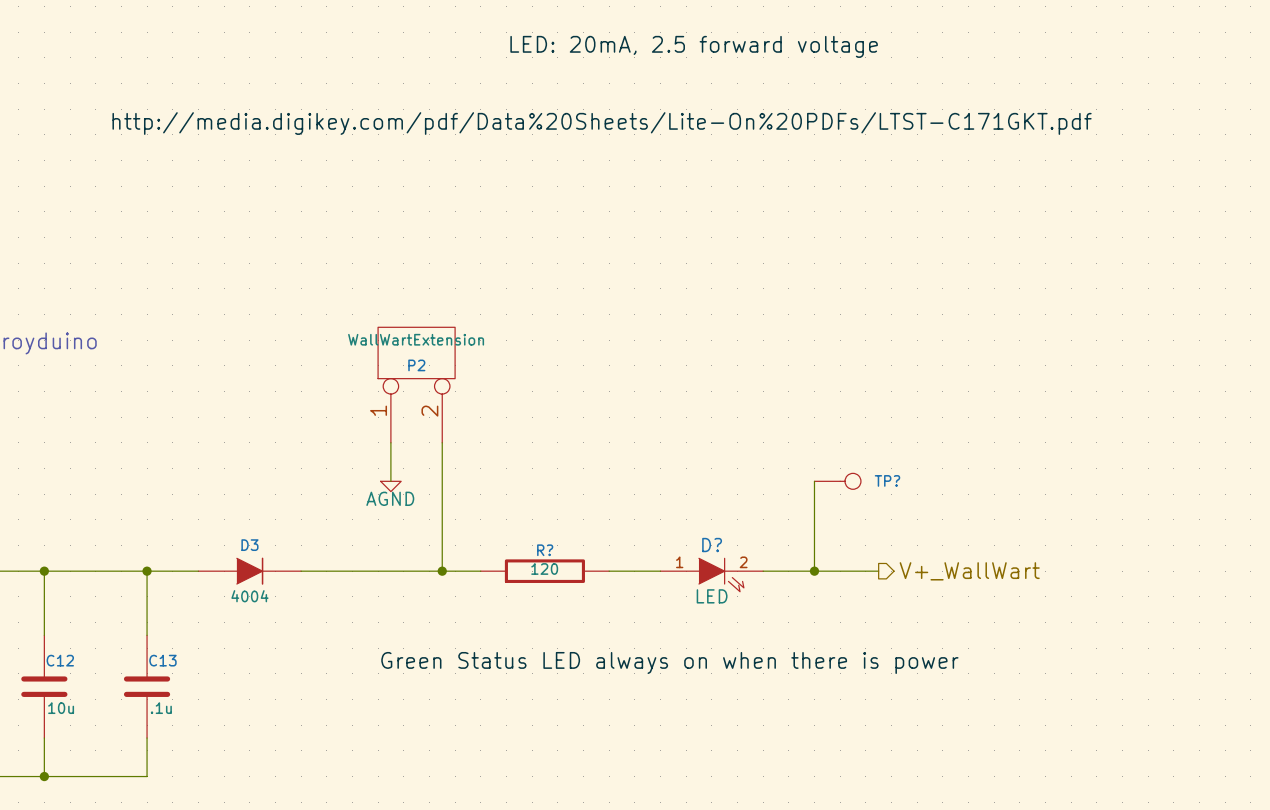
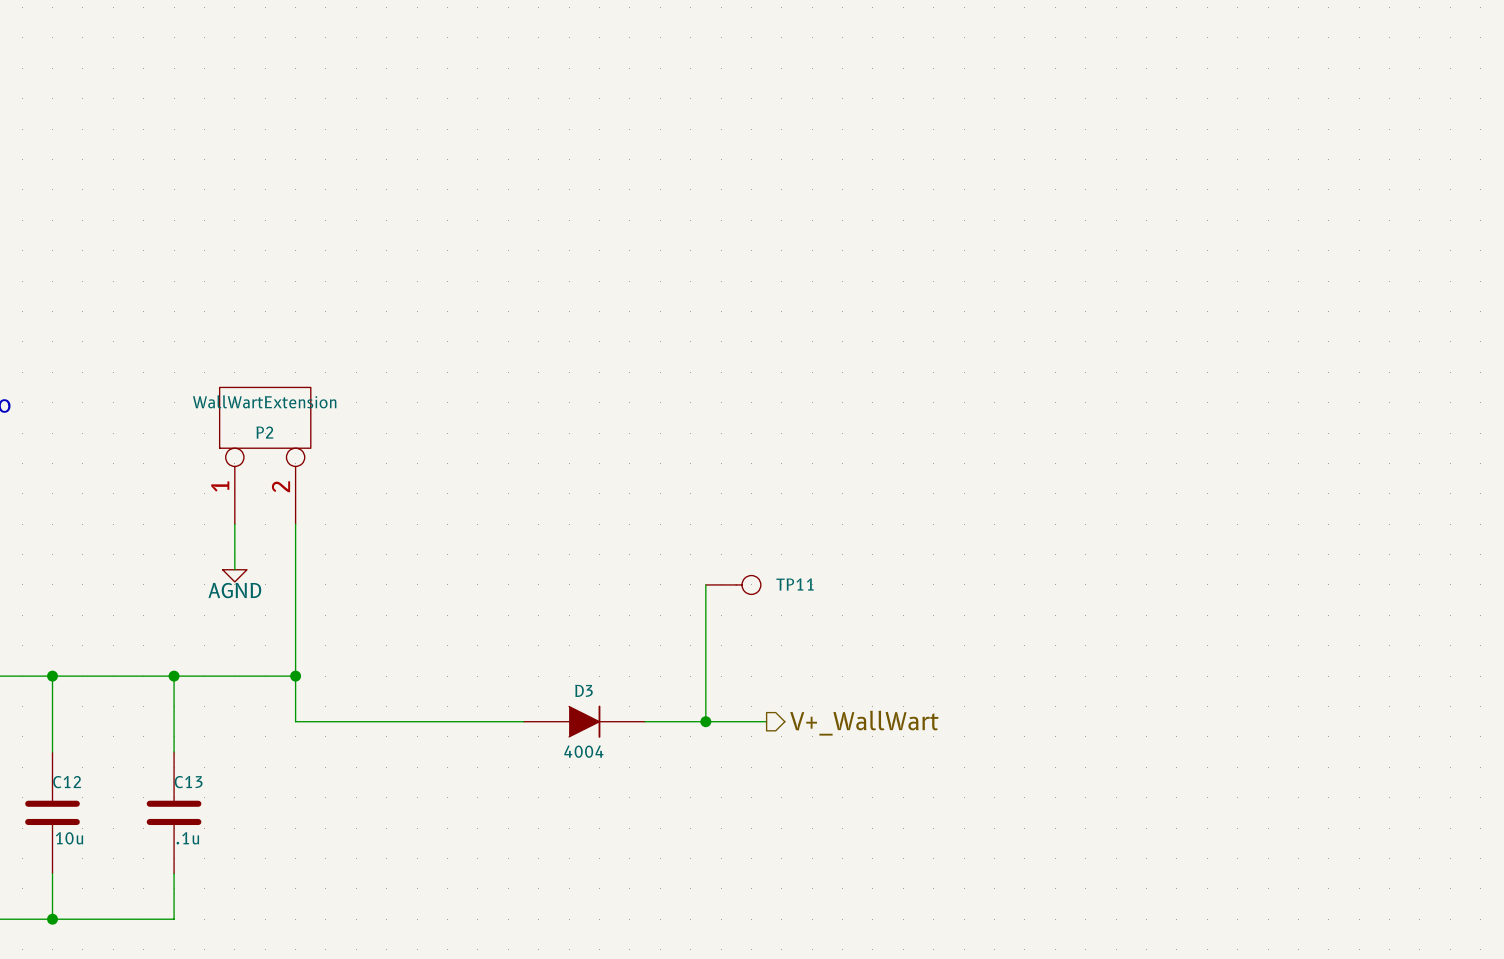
label: LED: 20mA, 2.5 forward voltage (694, 46) -> none
label: http://media.digikey.com/pdf/Data%20Sheets/Lite-On%20PDFs/LTST-C171GKT.pdf (602, 123) -> none
P2 position: (416, 385) -> (265, 455)
wire: none -> (295, 524) (295, 721) (523, 721)
wire: (390, 442) (390, 481) -> (234, 524) (234, 569)
wire: (442, 442) (442, 571) -> none
wire: (814, 481) (814, 571) -> none
TP?: (837, 481) -> none
power symbol position: AGND (390, 486) -> AGND (234, 575)
wire: none -> (705, 584) (705, 721)
TP11: none -> (733, 584)
D3 position: (249, 571) -> (584, 721)
junction: none -> (295, 676)
wire: (301, 571) (480, 571) -> none
junction: (442, 571) -> none
R?: 120 (544, 571) -> none
wire: (609, 571) (660, 571) -> none
wire: (763, 571) (878, 571) -> none
junction: (814, 571) -> none
hierarchical label position: V+_WallWart (969, 571) -> V+_WallWart (864, 723)
D?: LED (711, 575) -> none
wire: none -> (645, 721) (766, 721)
junction: none -> (705, 721)
label: Green Status LED always on when there is power (669, 662) -> none

